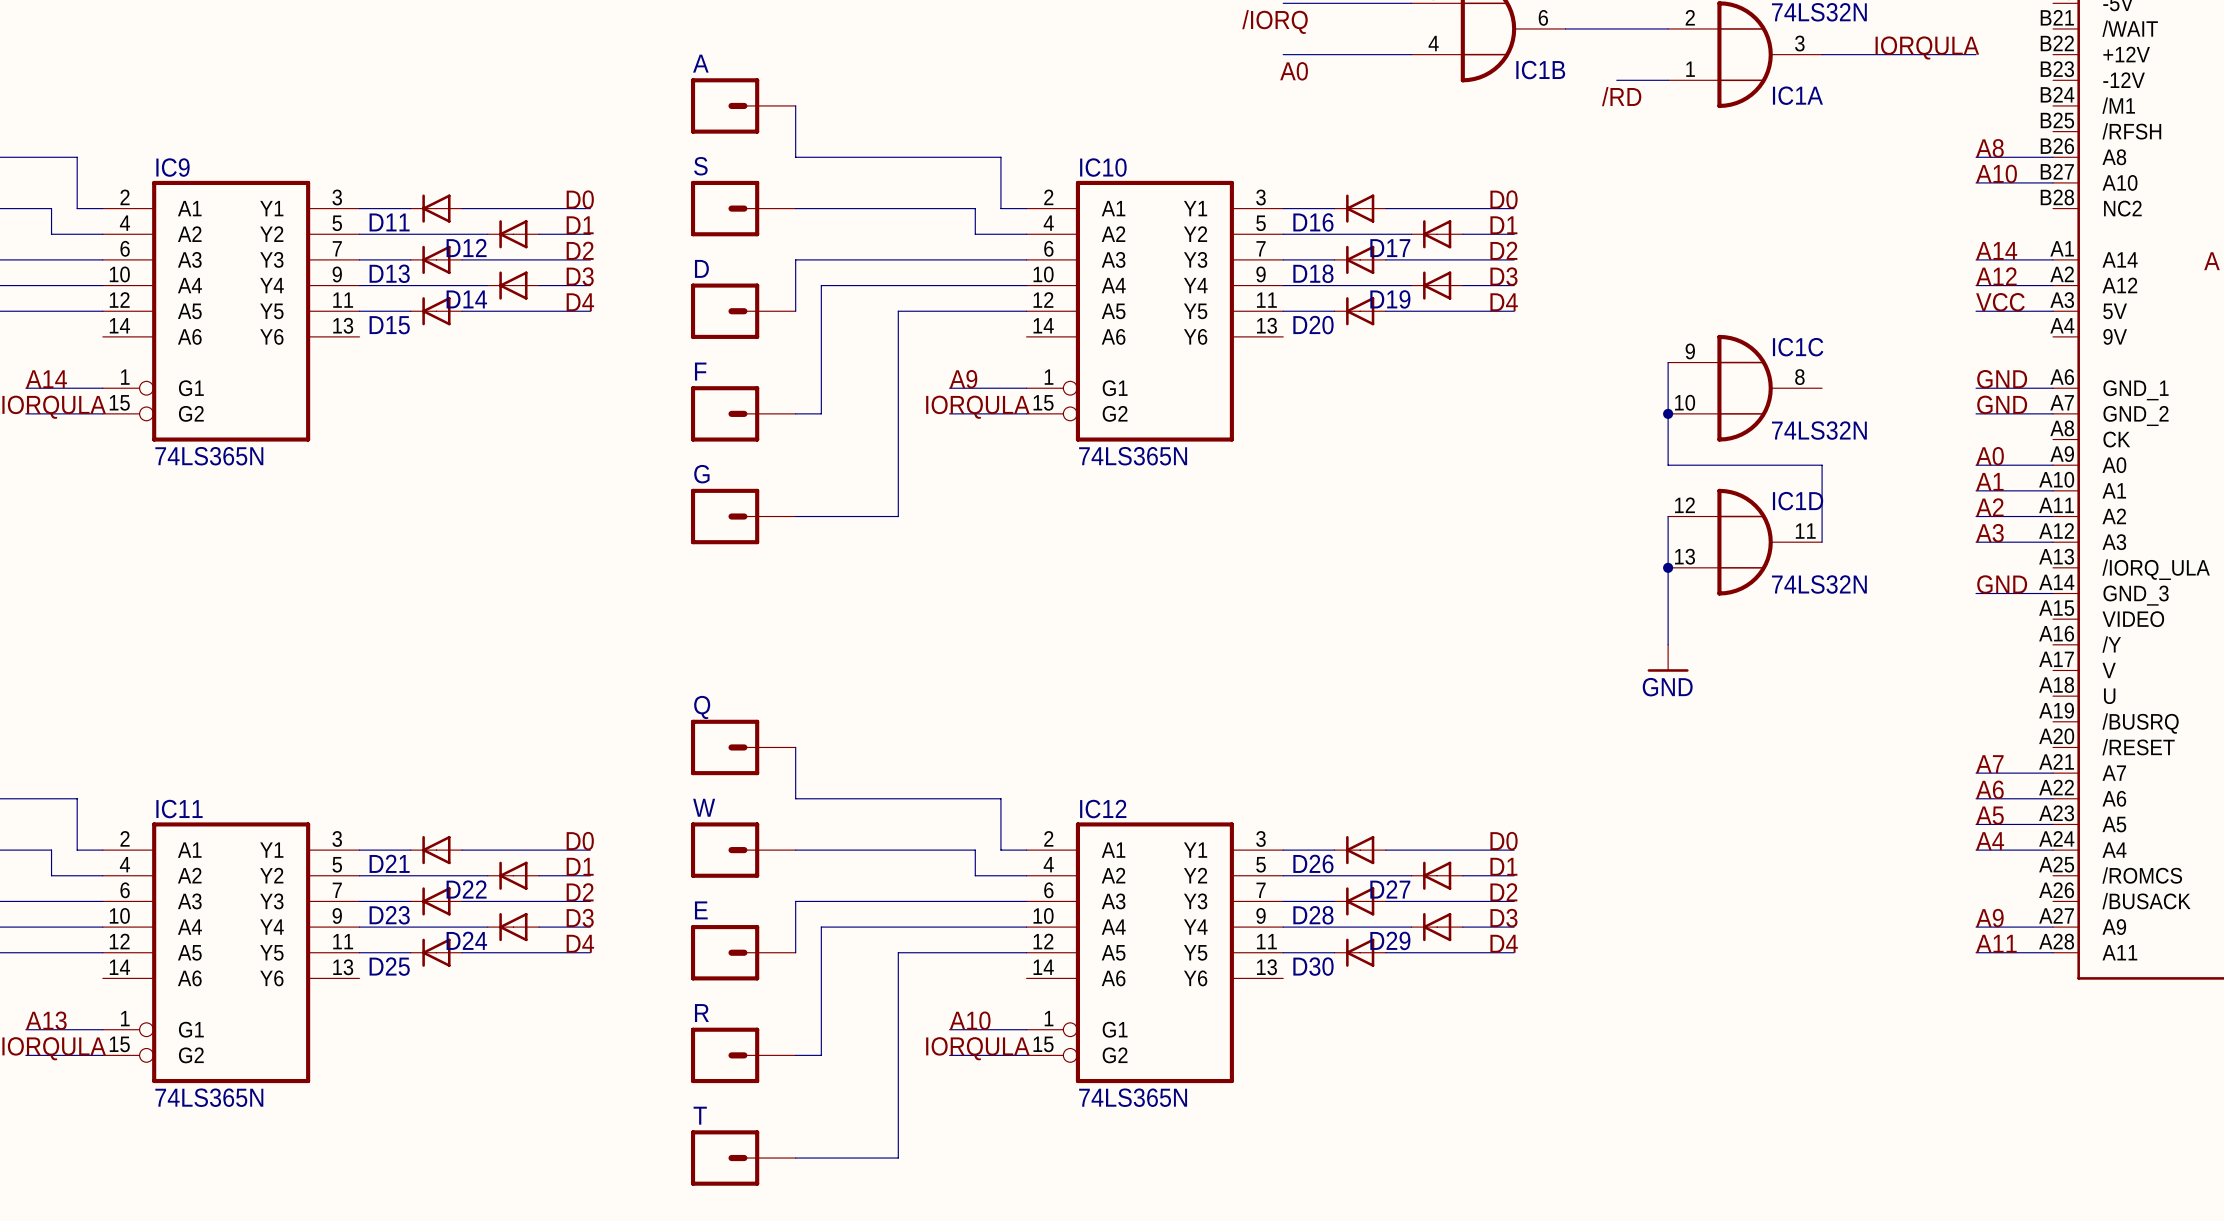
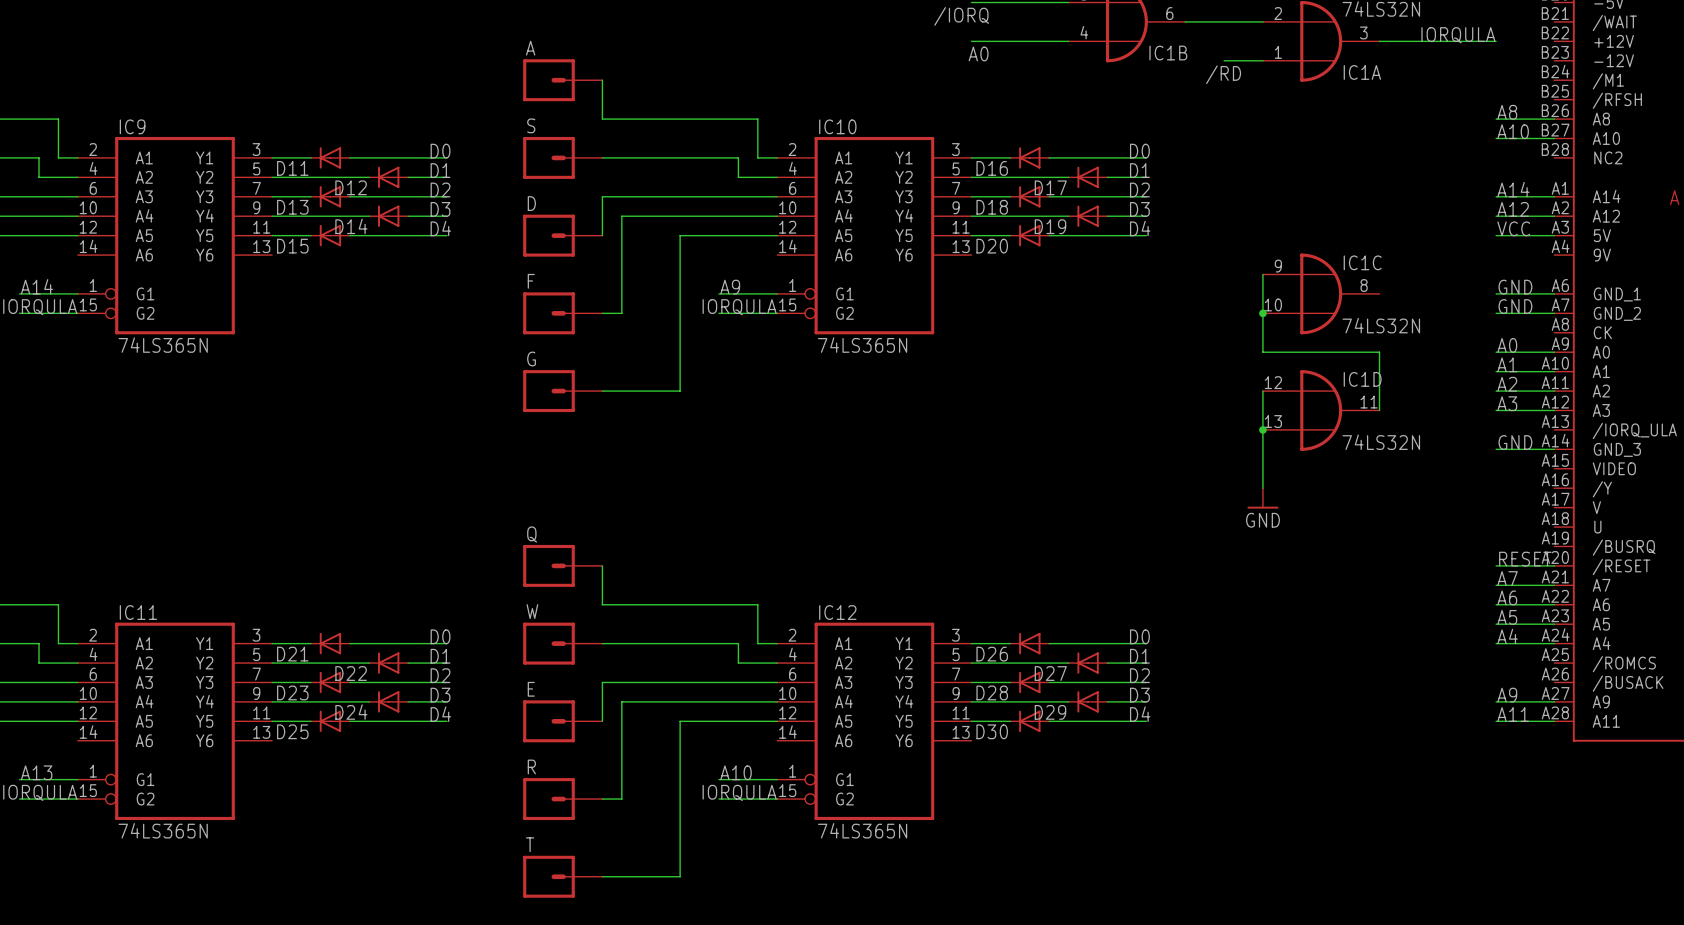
label: none -> RESET (1525, 559)
wire: none -> (1496, 565) (1554, 565)

